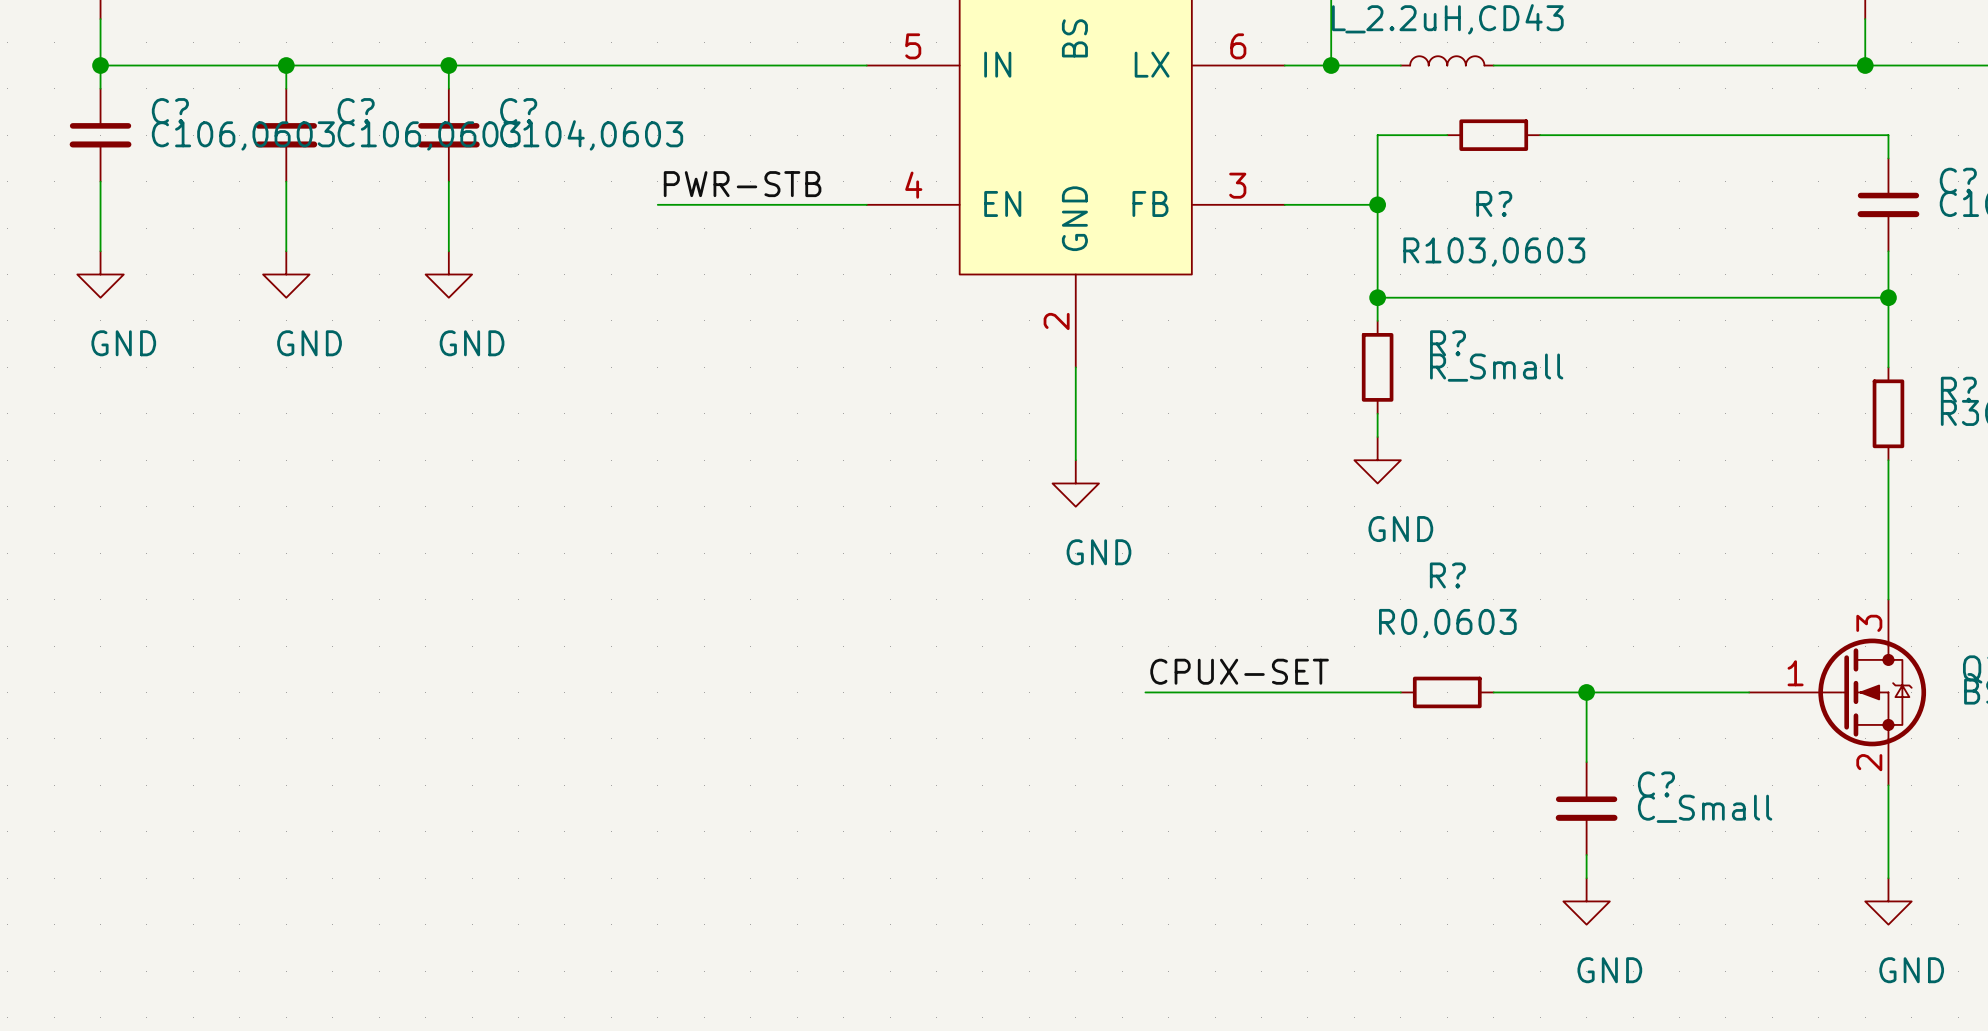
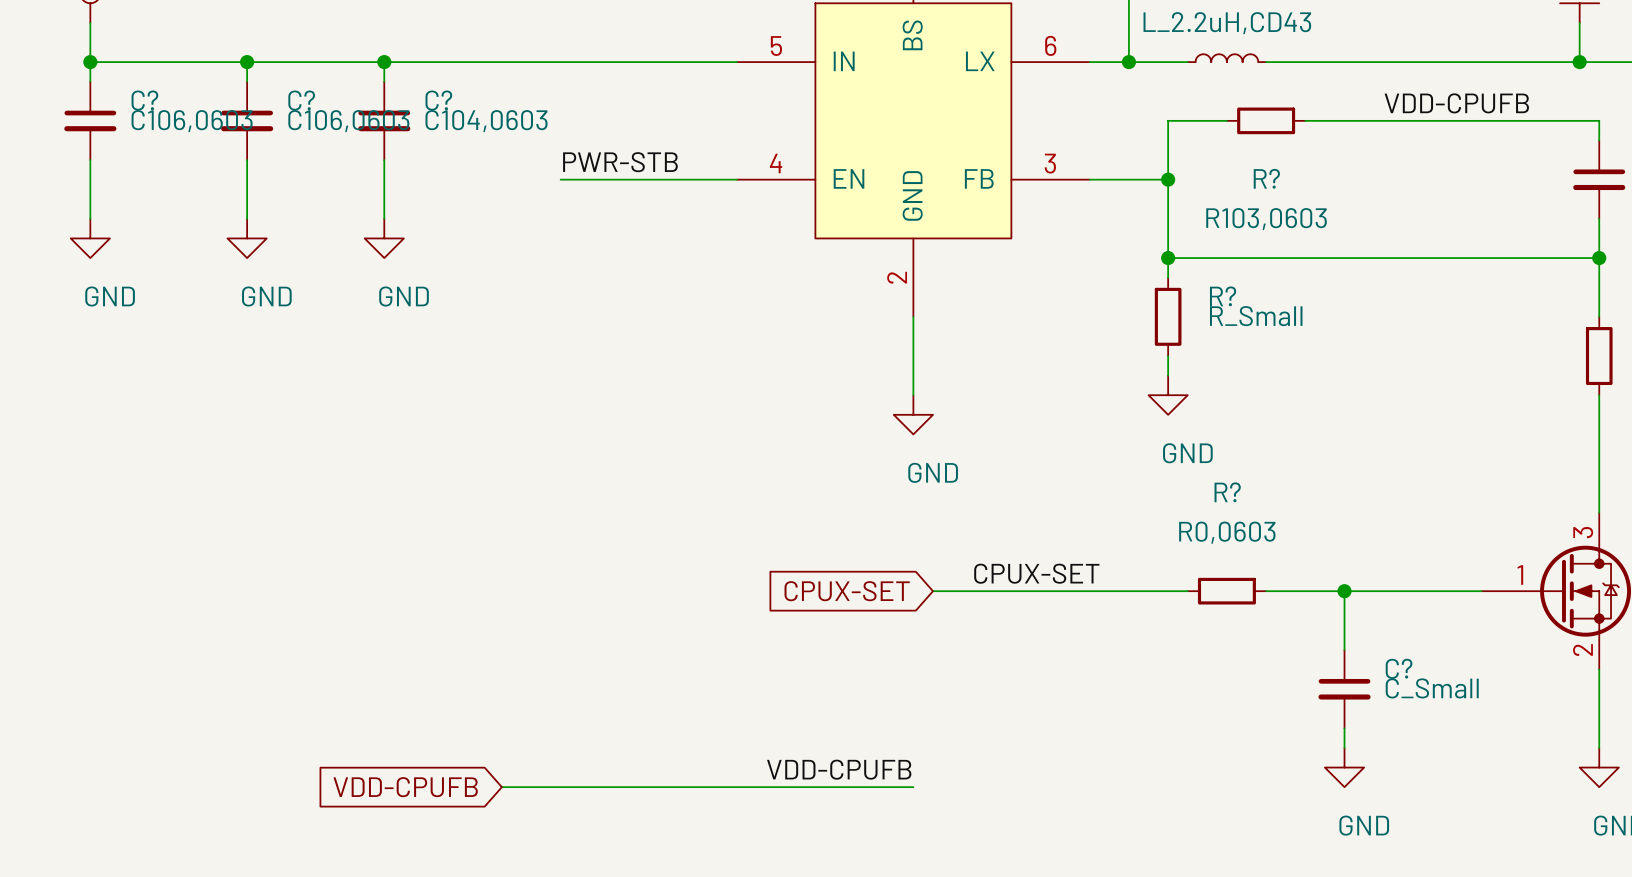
label: none -> VDD-CPUFB (1456, 103)
global label: none -> CPUX-SET (847, 591)
wire: none -> (932, 591) (972, 591)
label: none -> VDD-CPUFB (839, 769)
global label: none -> VDD-CPUFB (405, 787)
wire: none -> (501, 787) (913, 787)

